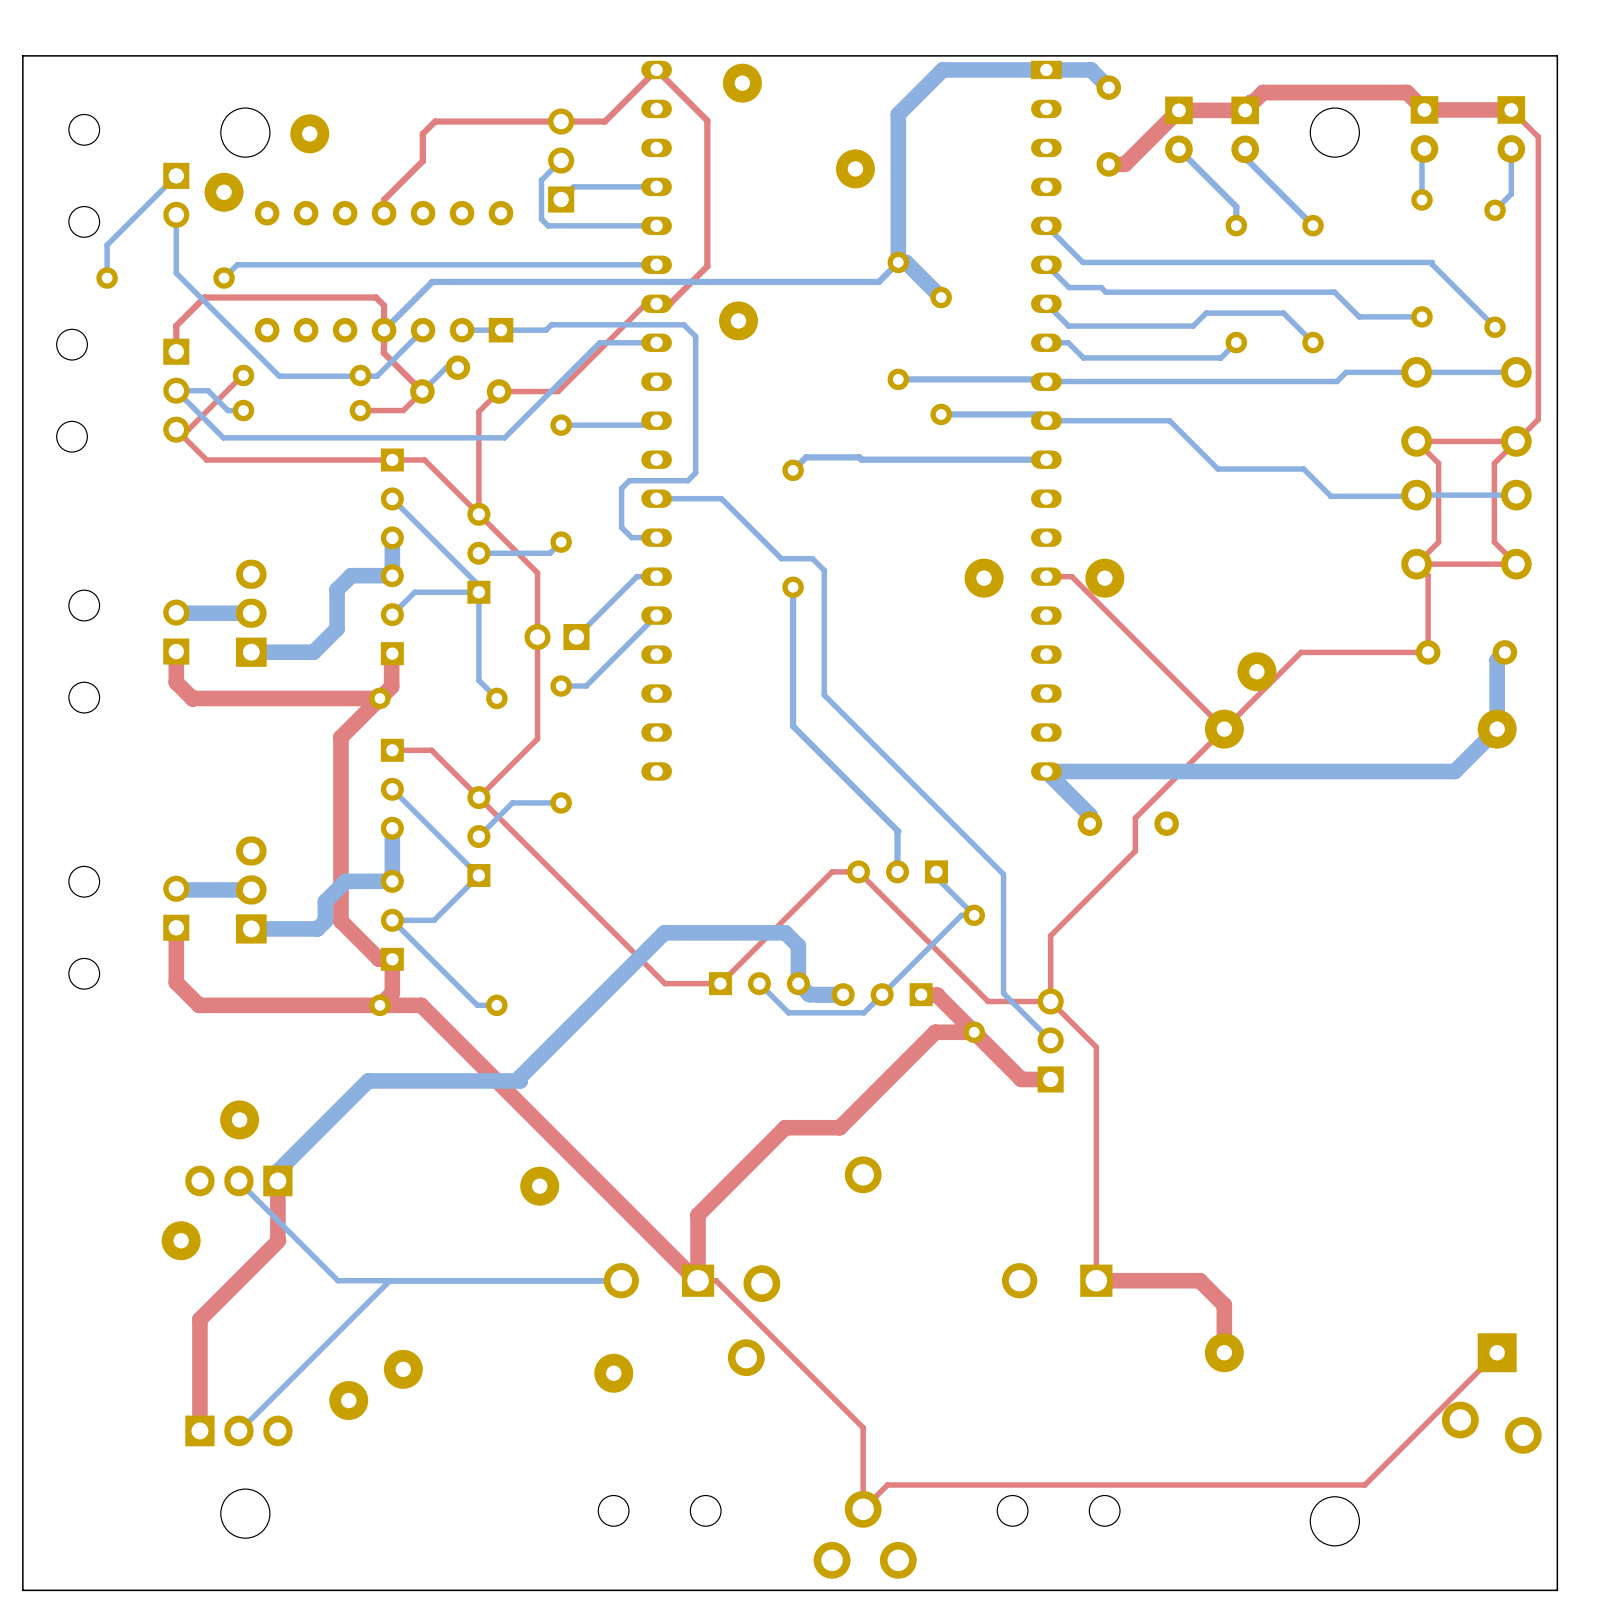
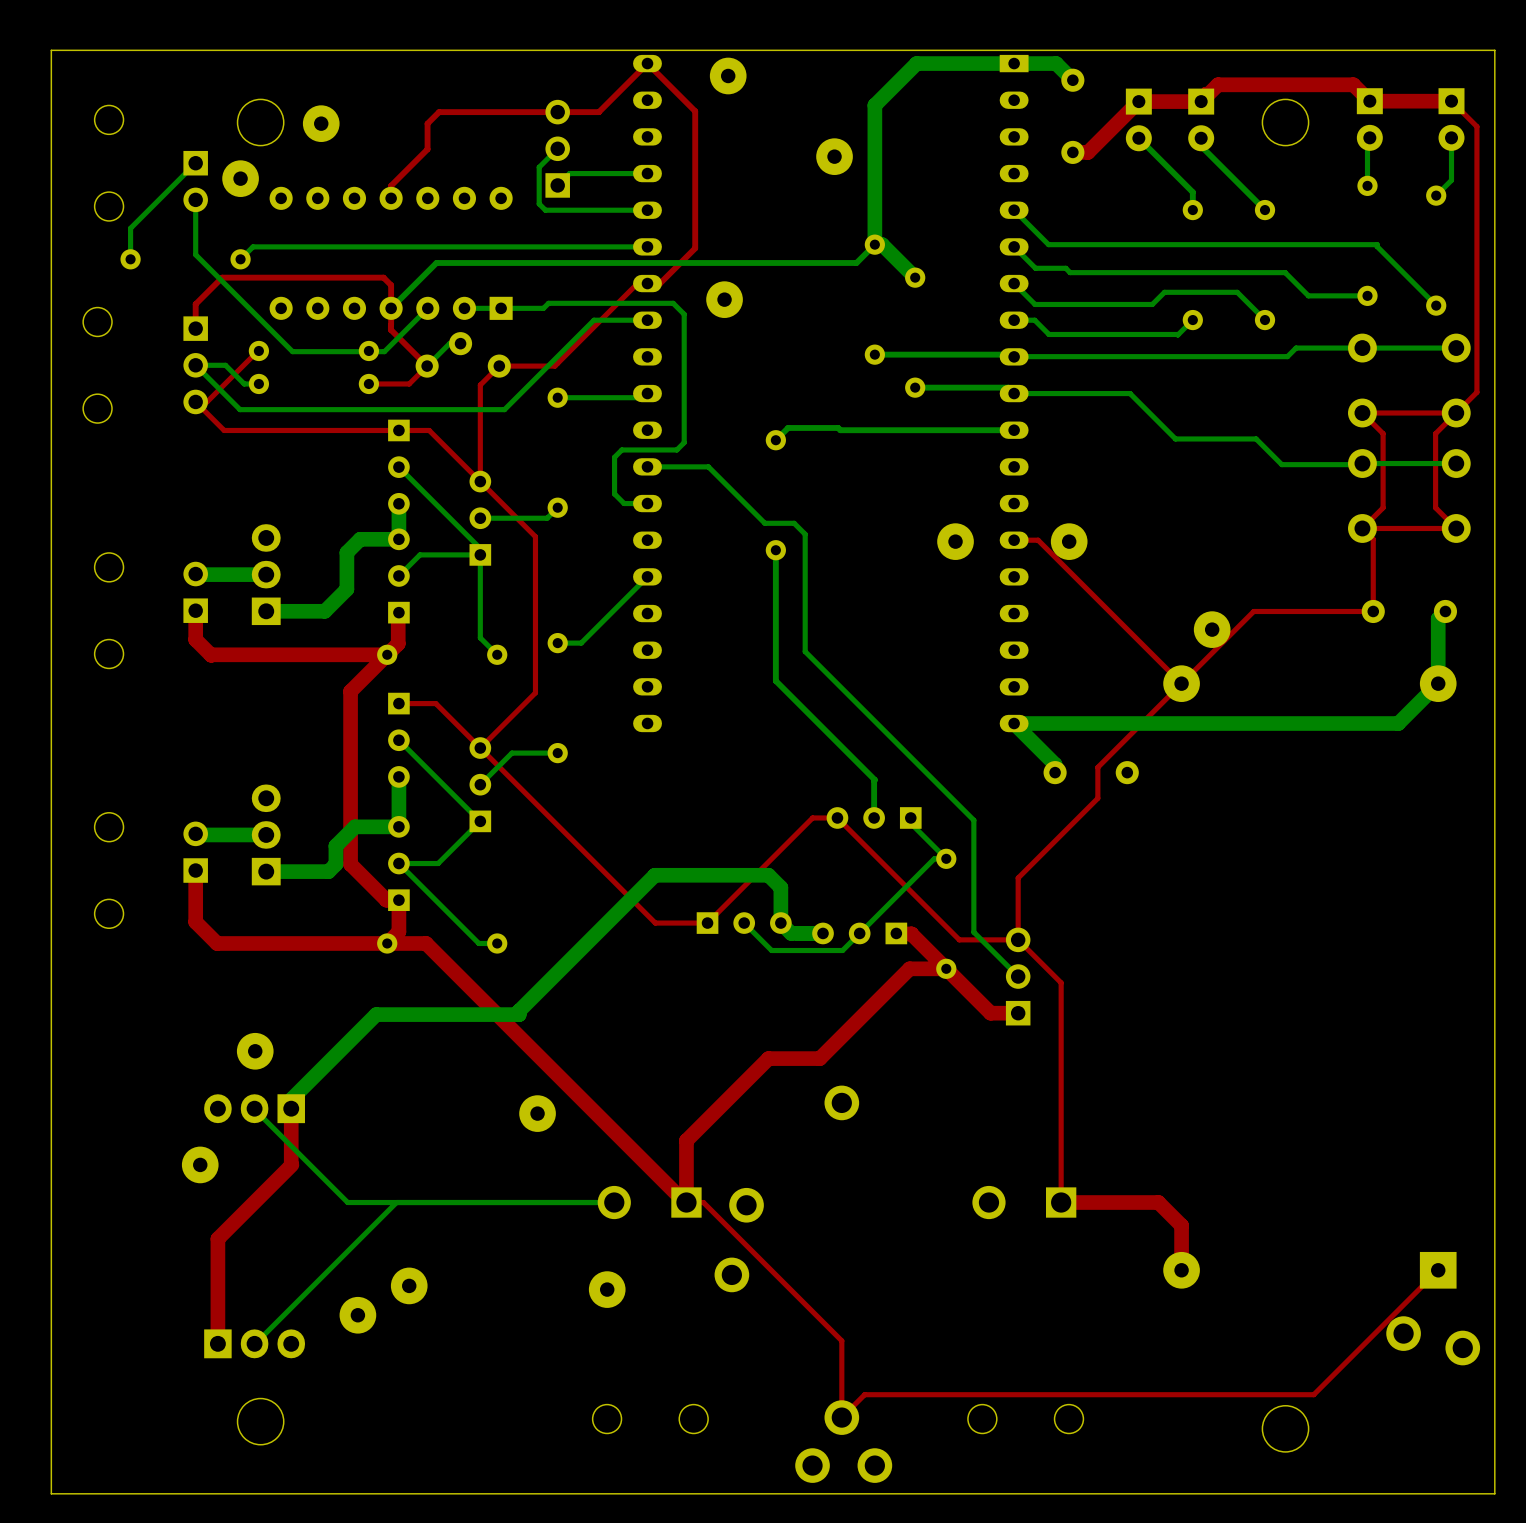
bottom track: (656, 576) (636, 576) (576, 637) -> none
part: (557, 637) -> none

